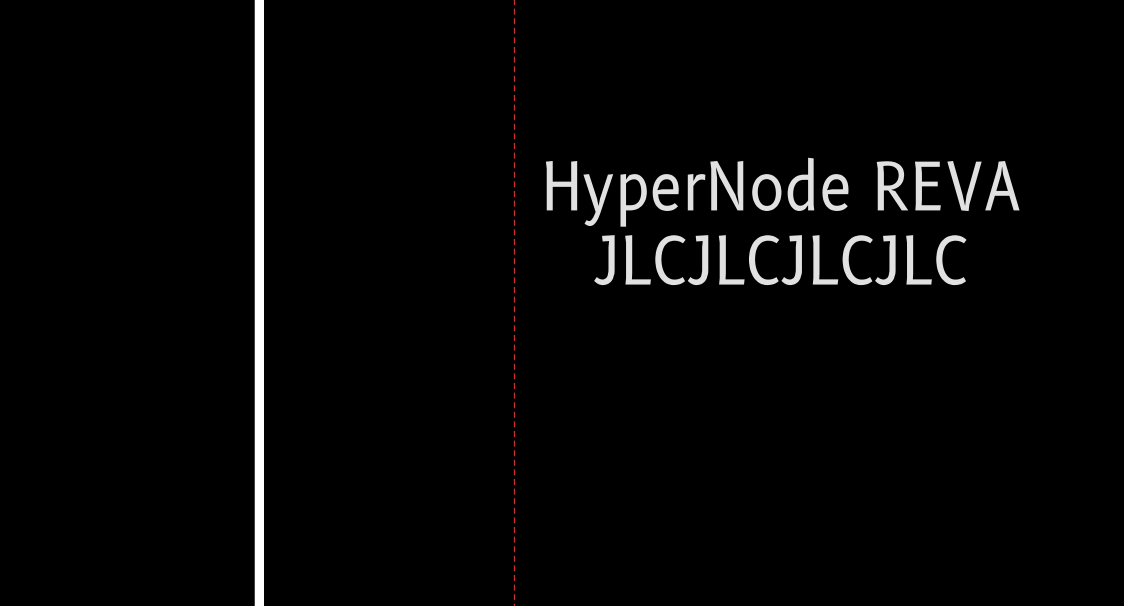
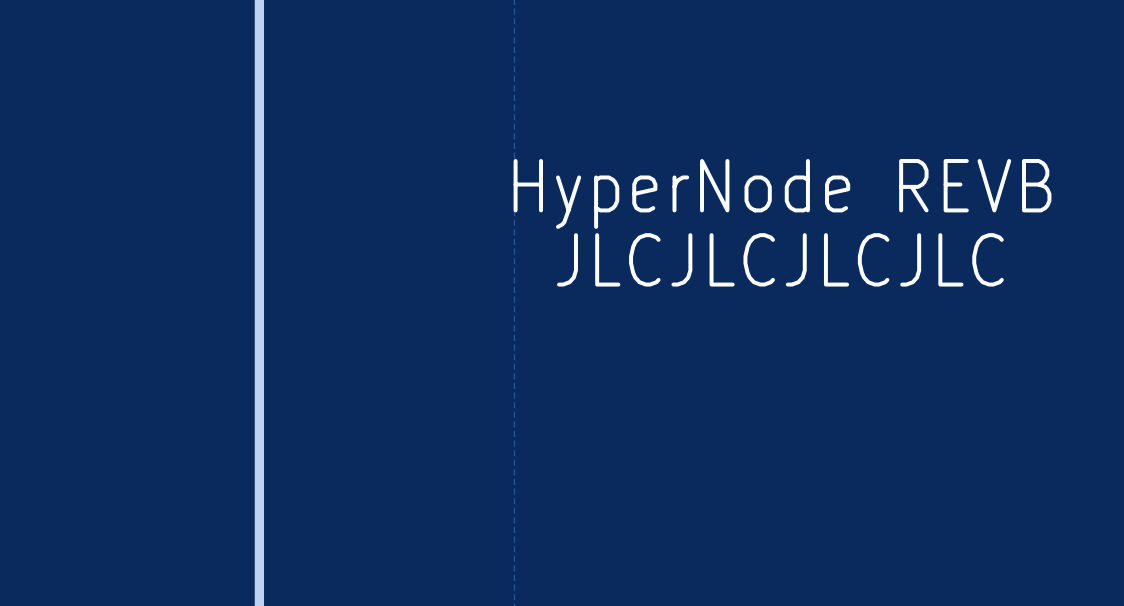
text: HyperNode REVA (782, 192) -> HyperNode REVB (782, 193)

